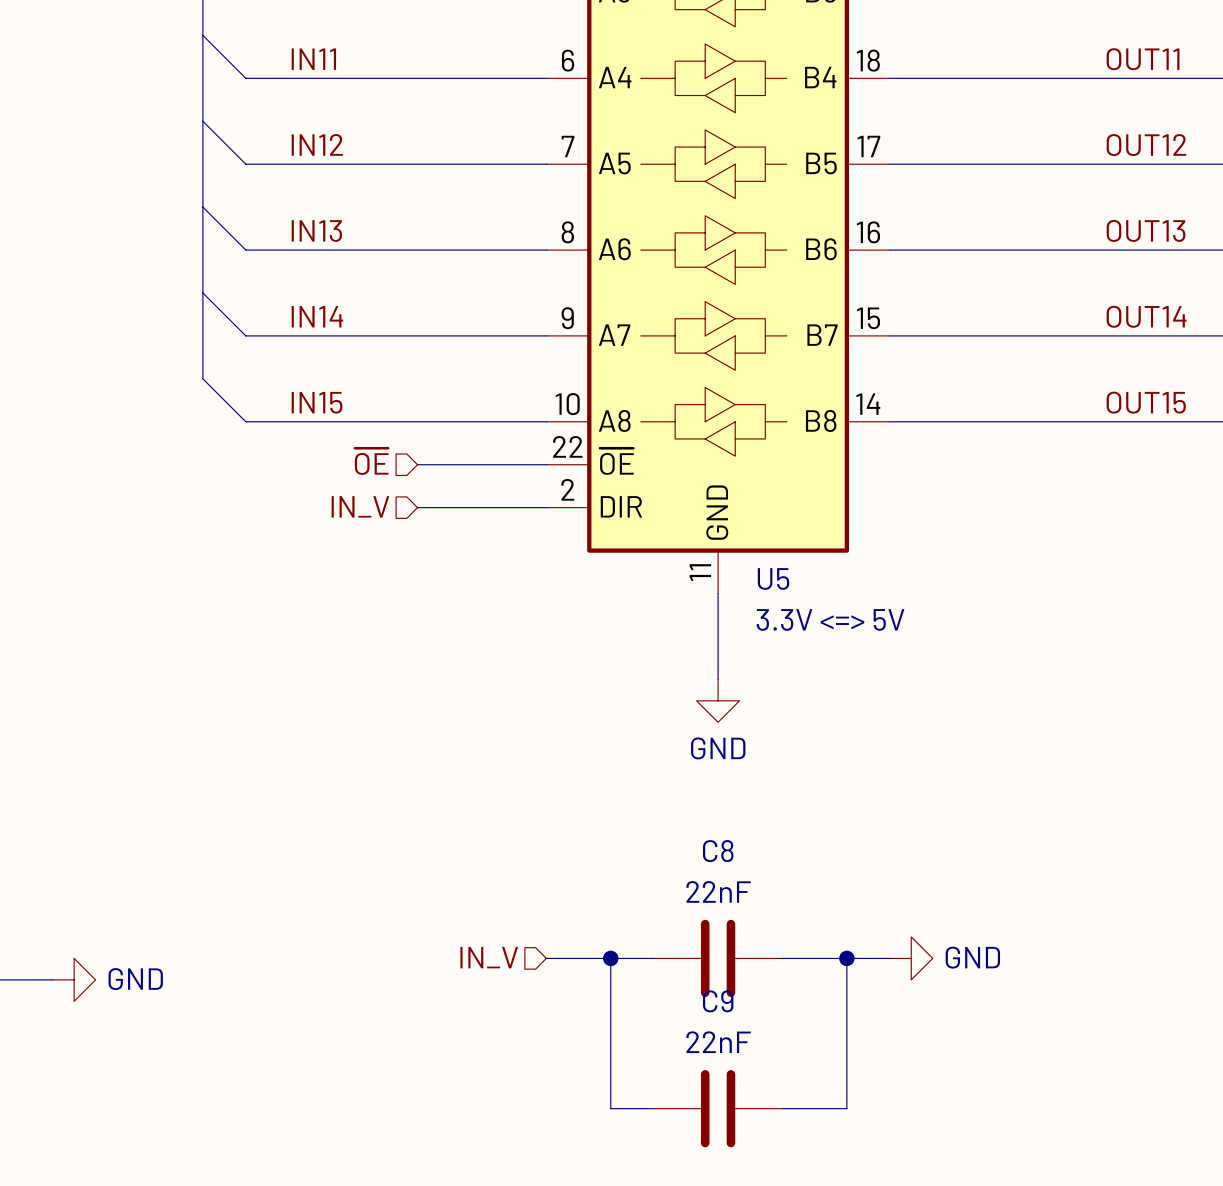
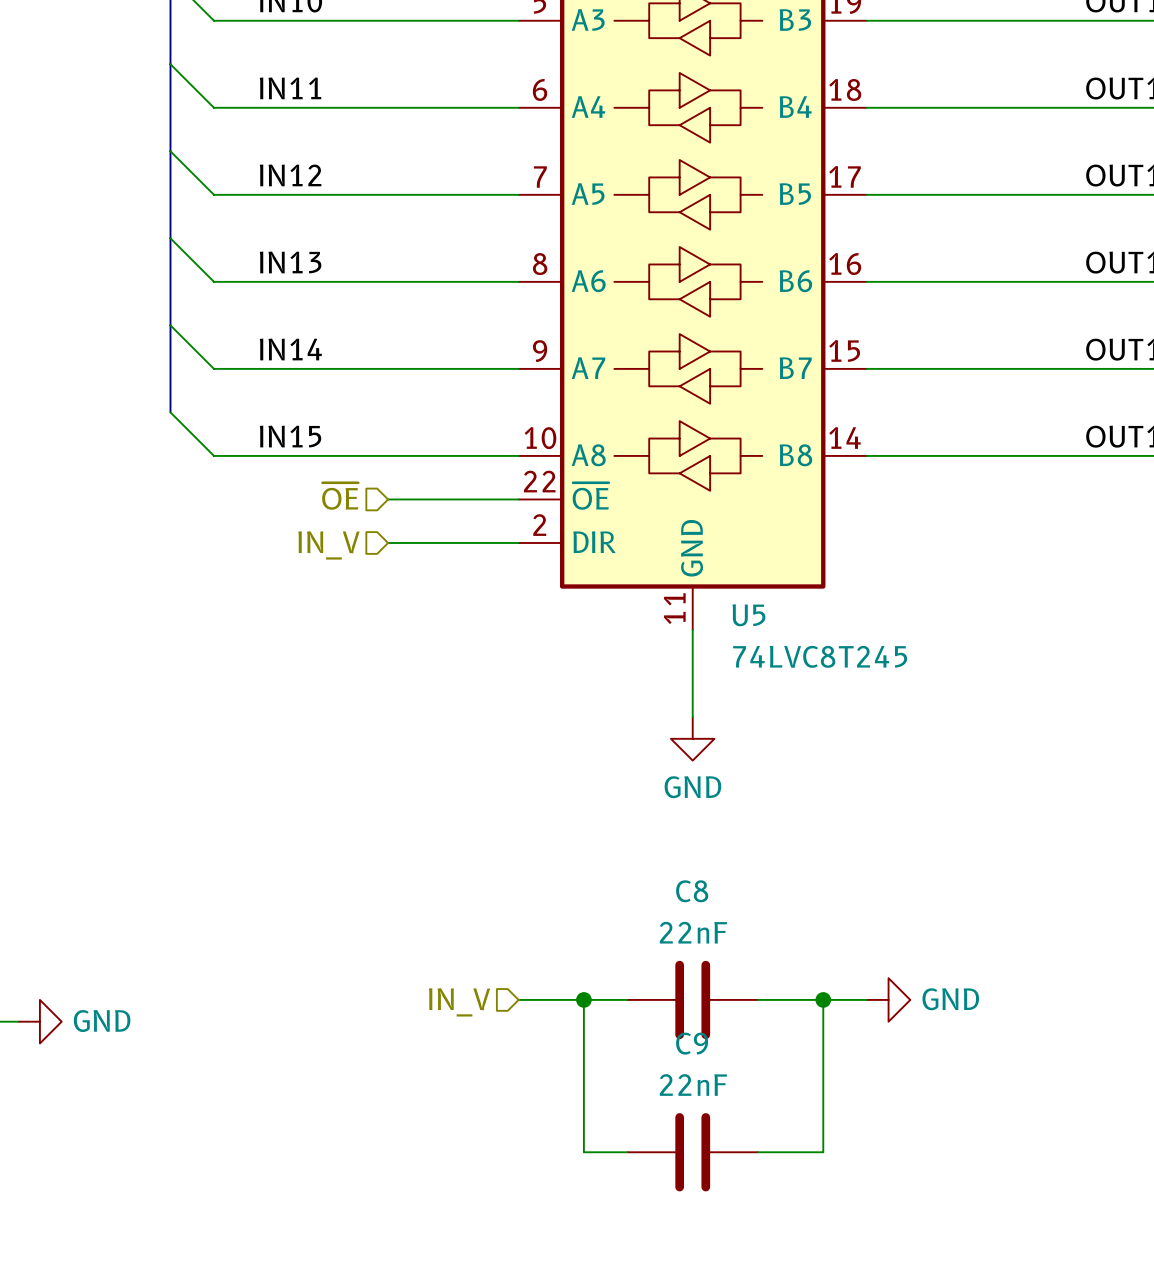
U5 value: 3.3V <=> 5V (830, 619) -> 74LVC8T245 (820, 656)

